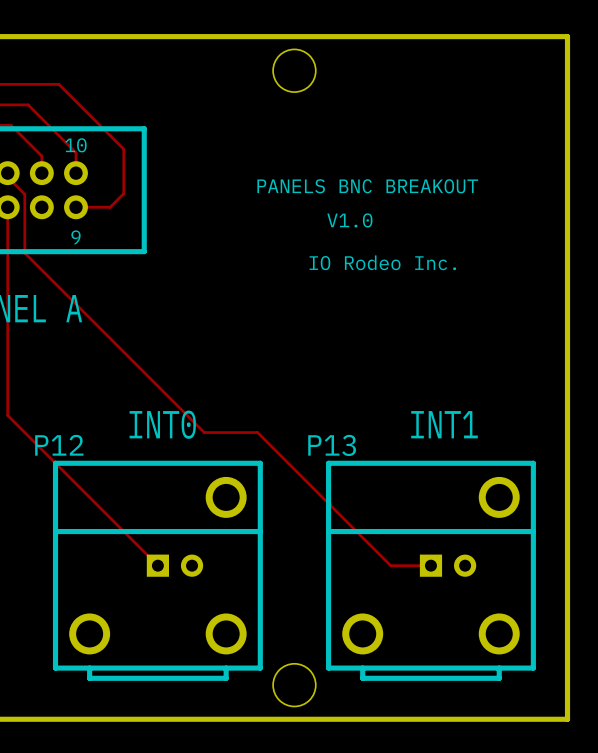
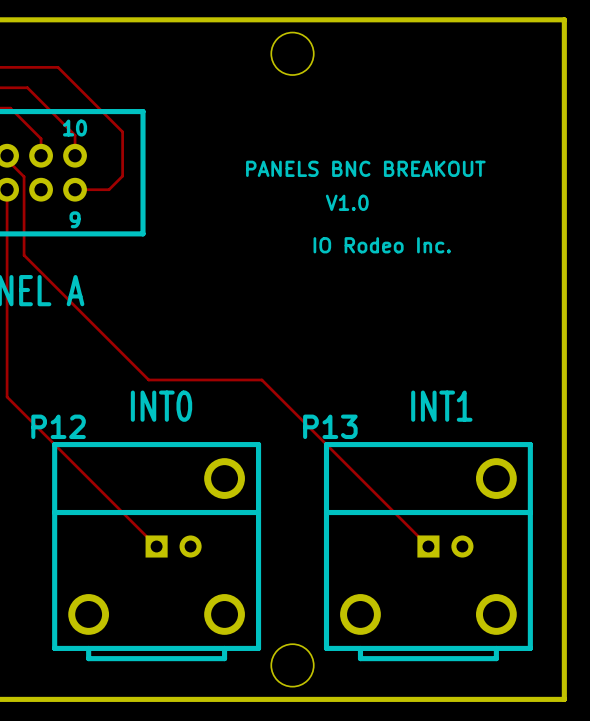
track: (24, 253) (204, 432) (257, 432) (390, 565) (430, 565) -> (24, 235) (24, 255) (148, 380) (261, 380) (428, 546)

